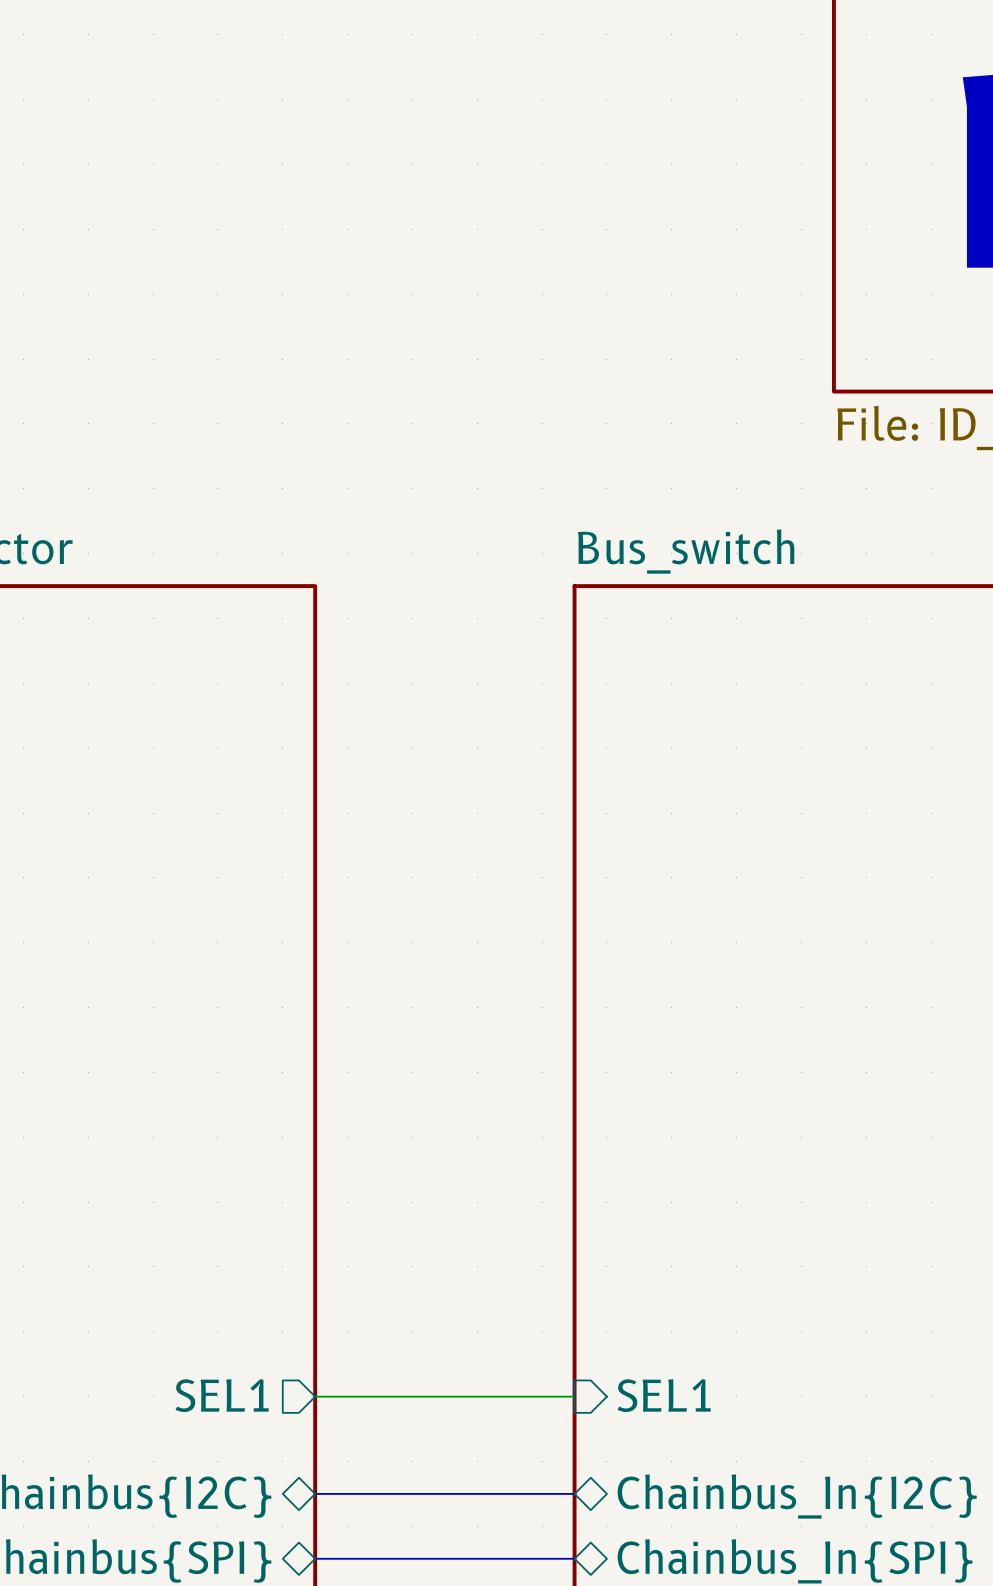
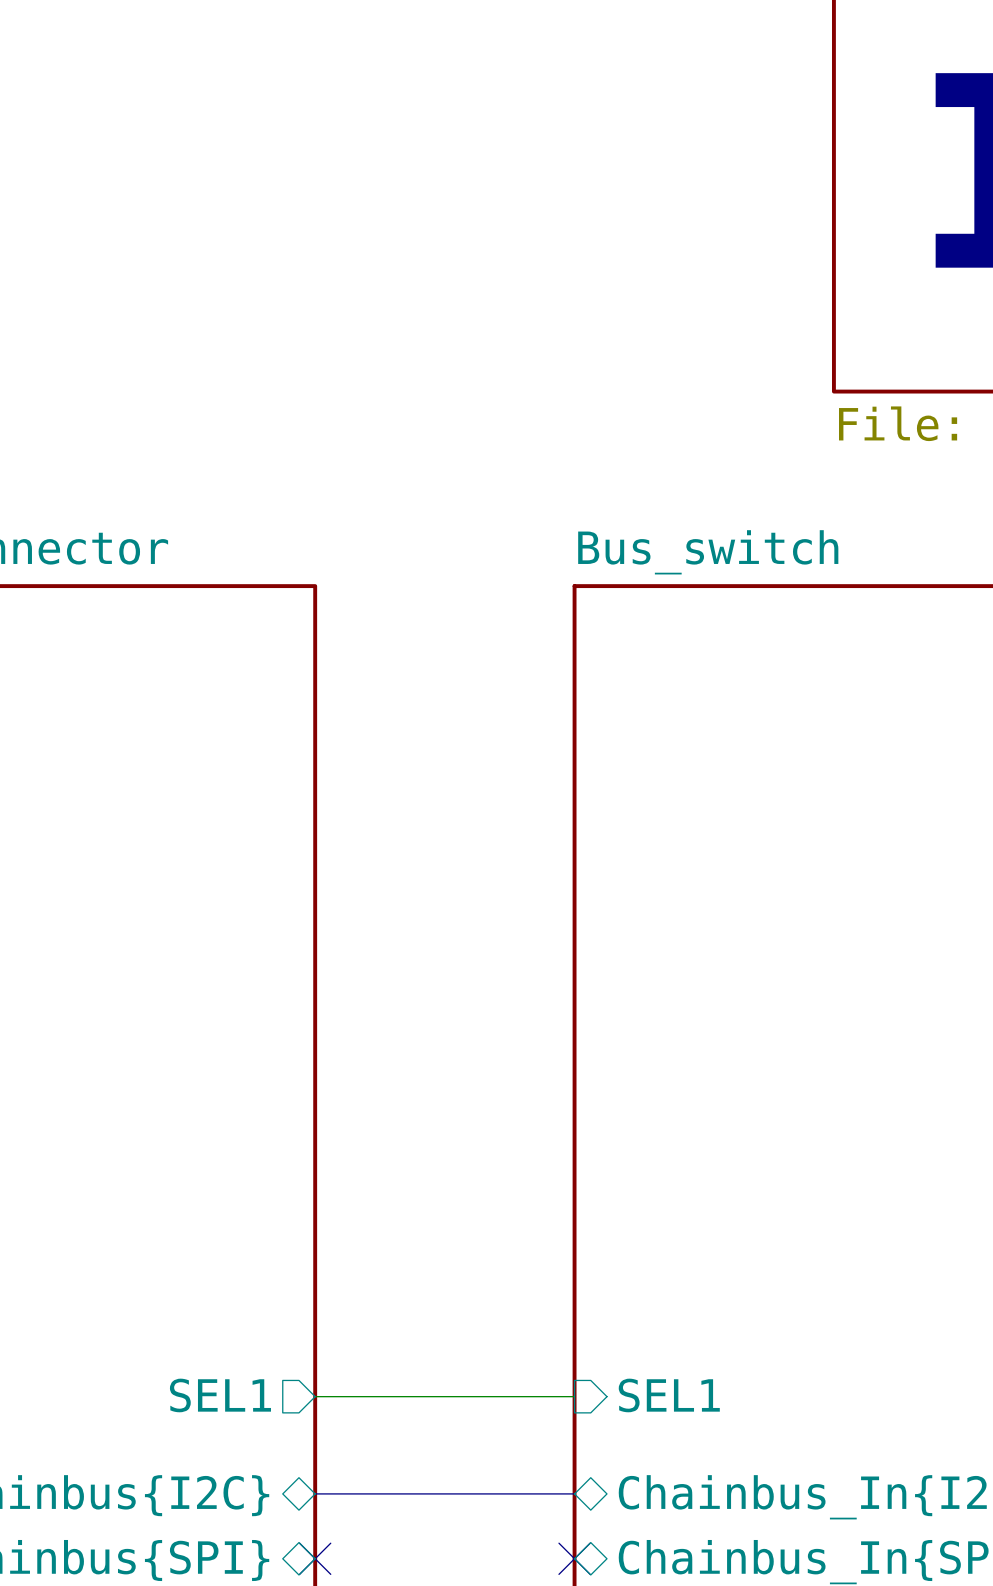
bus: (315, 1558) (574, 1558) -> none
no-connect mark: none -> (315, 1558)
no-connect mark: none -> (574, 1558)

